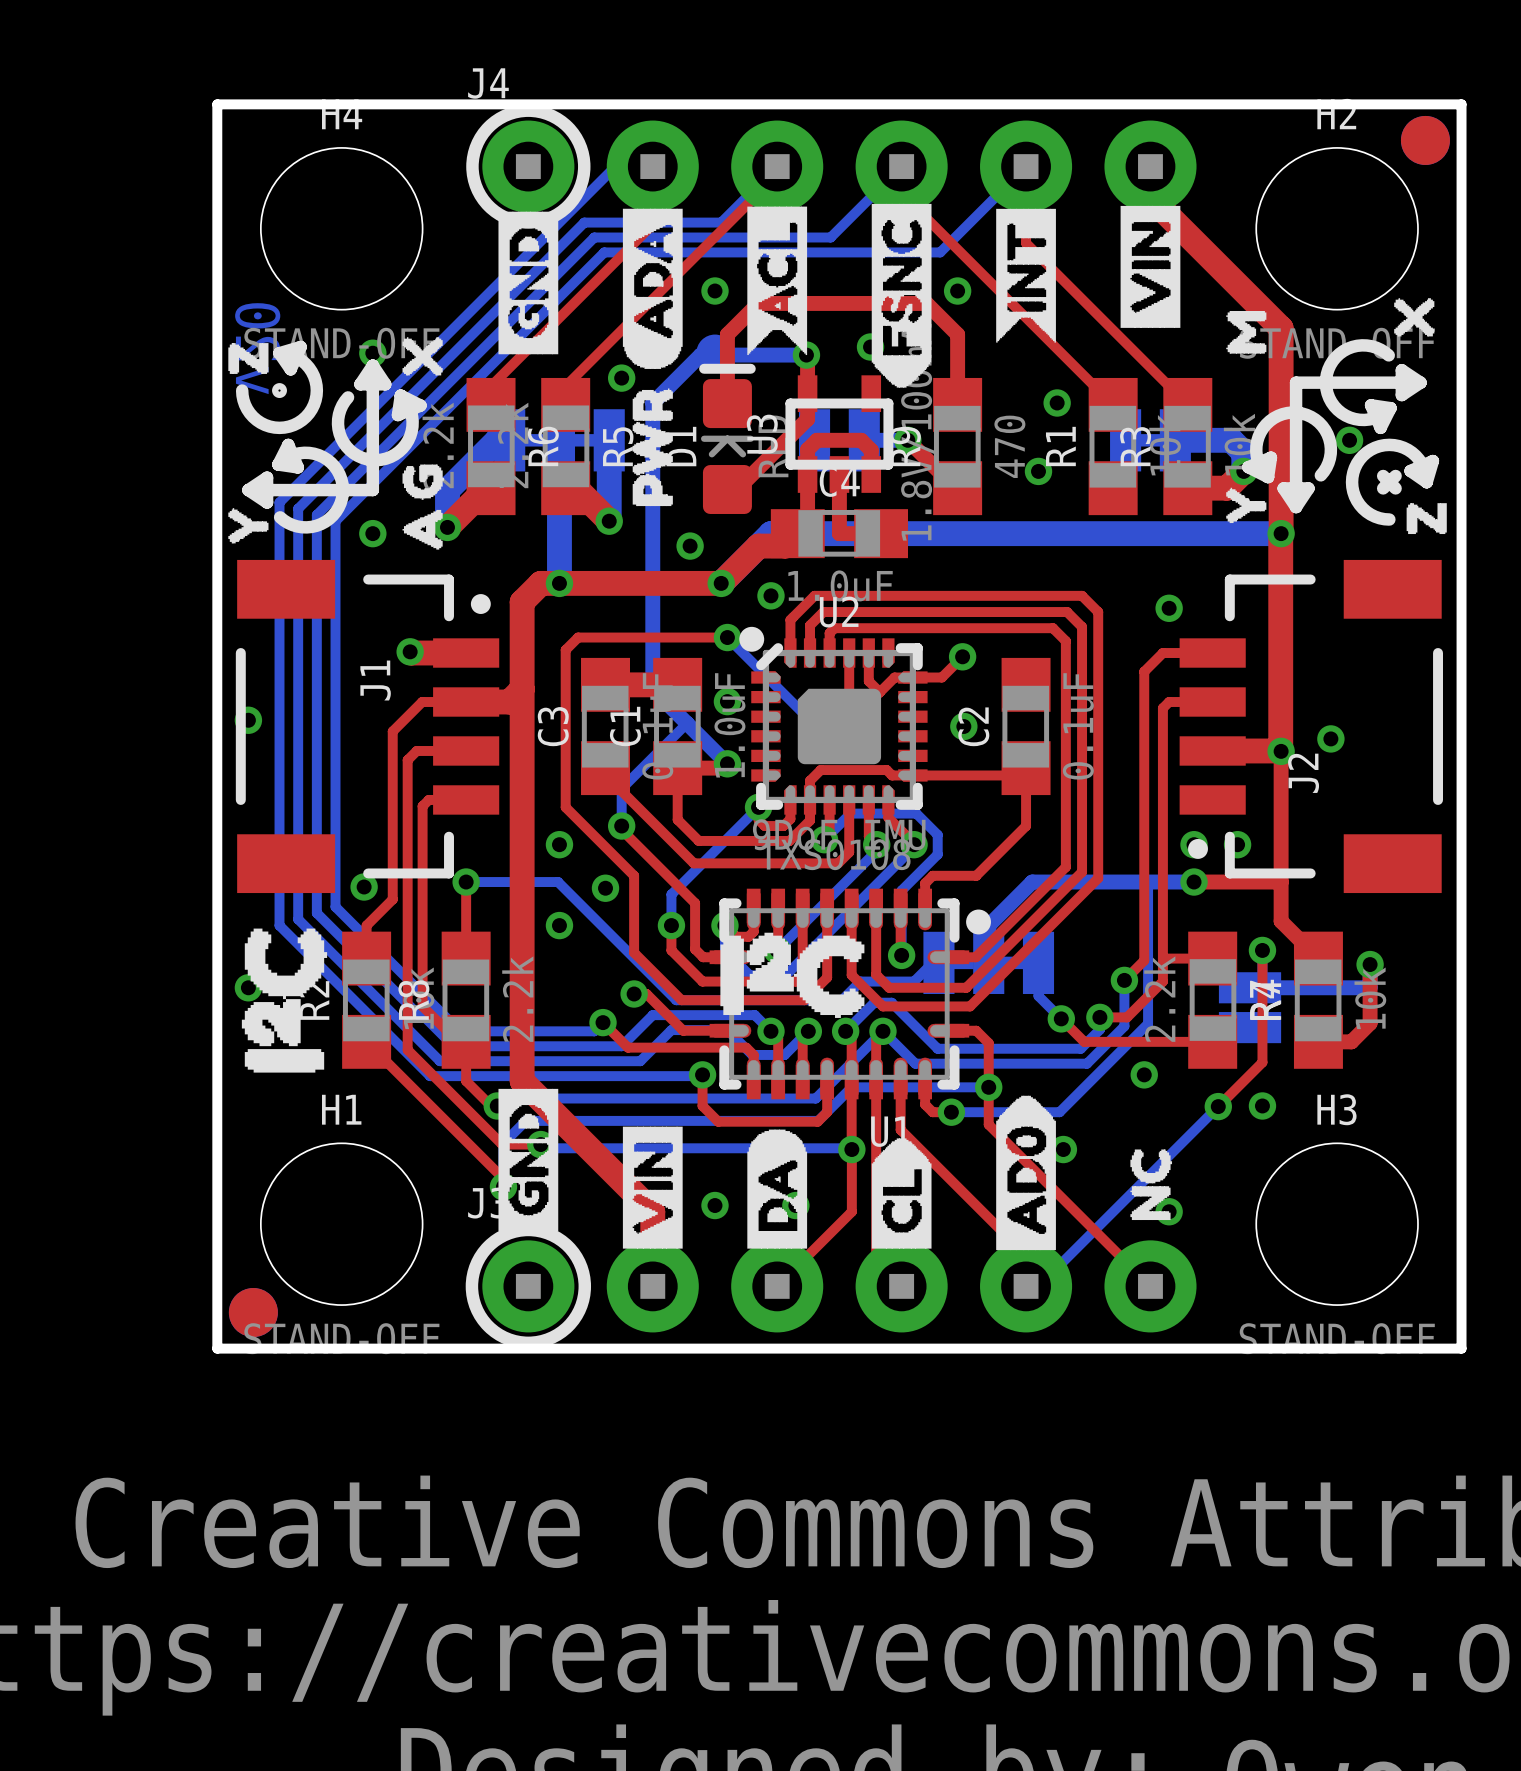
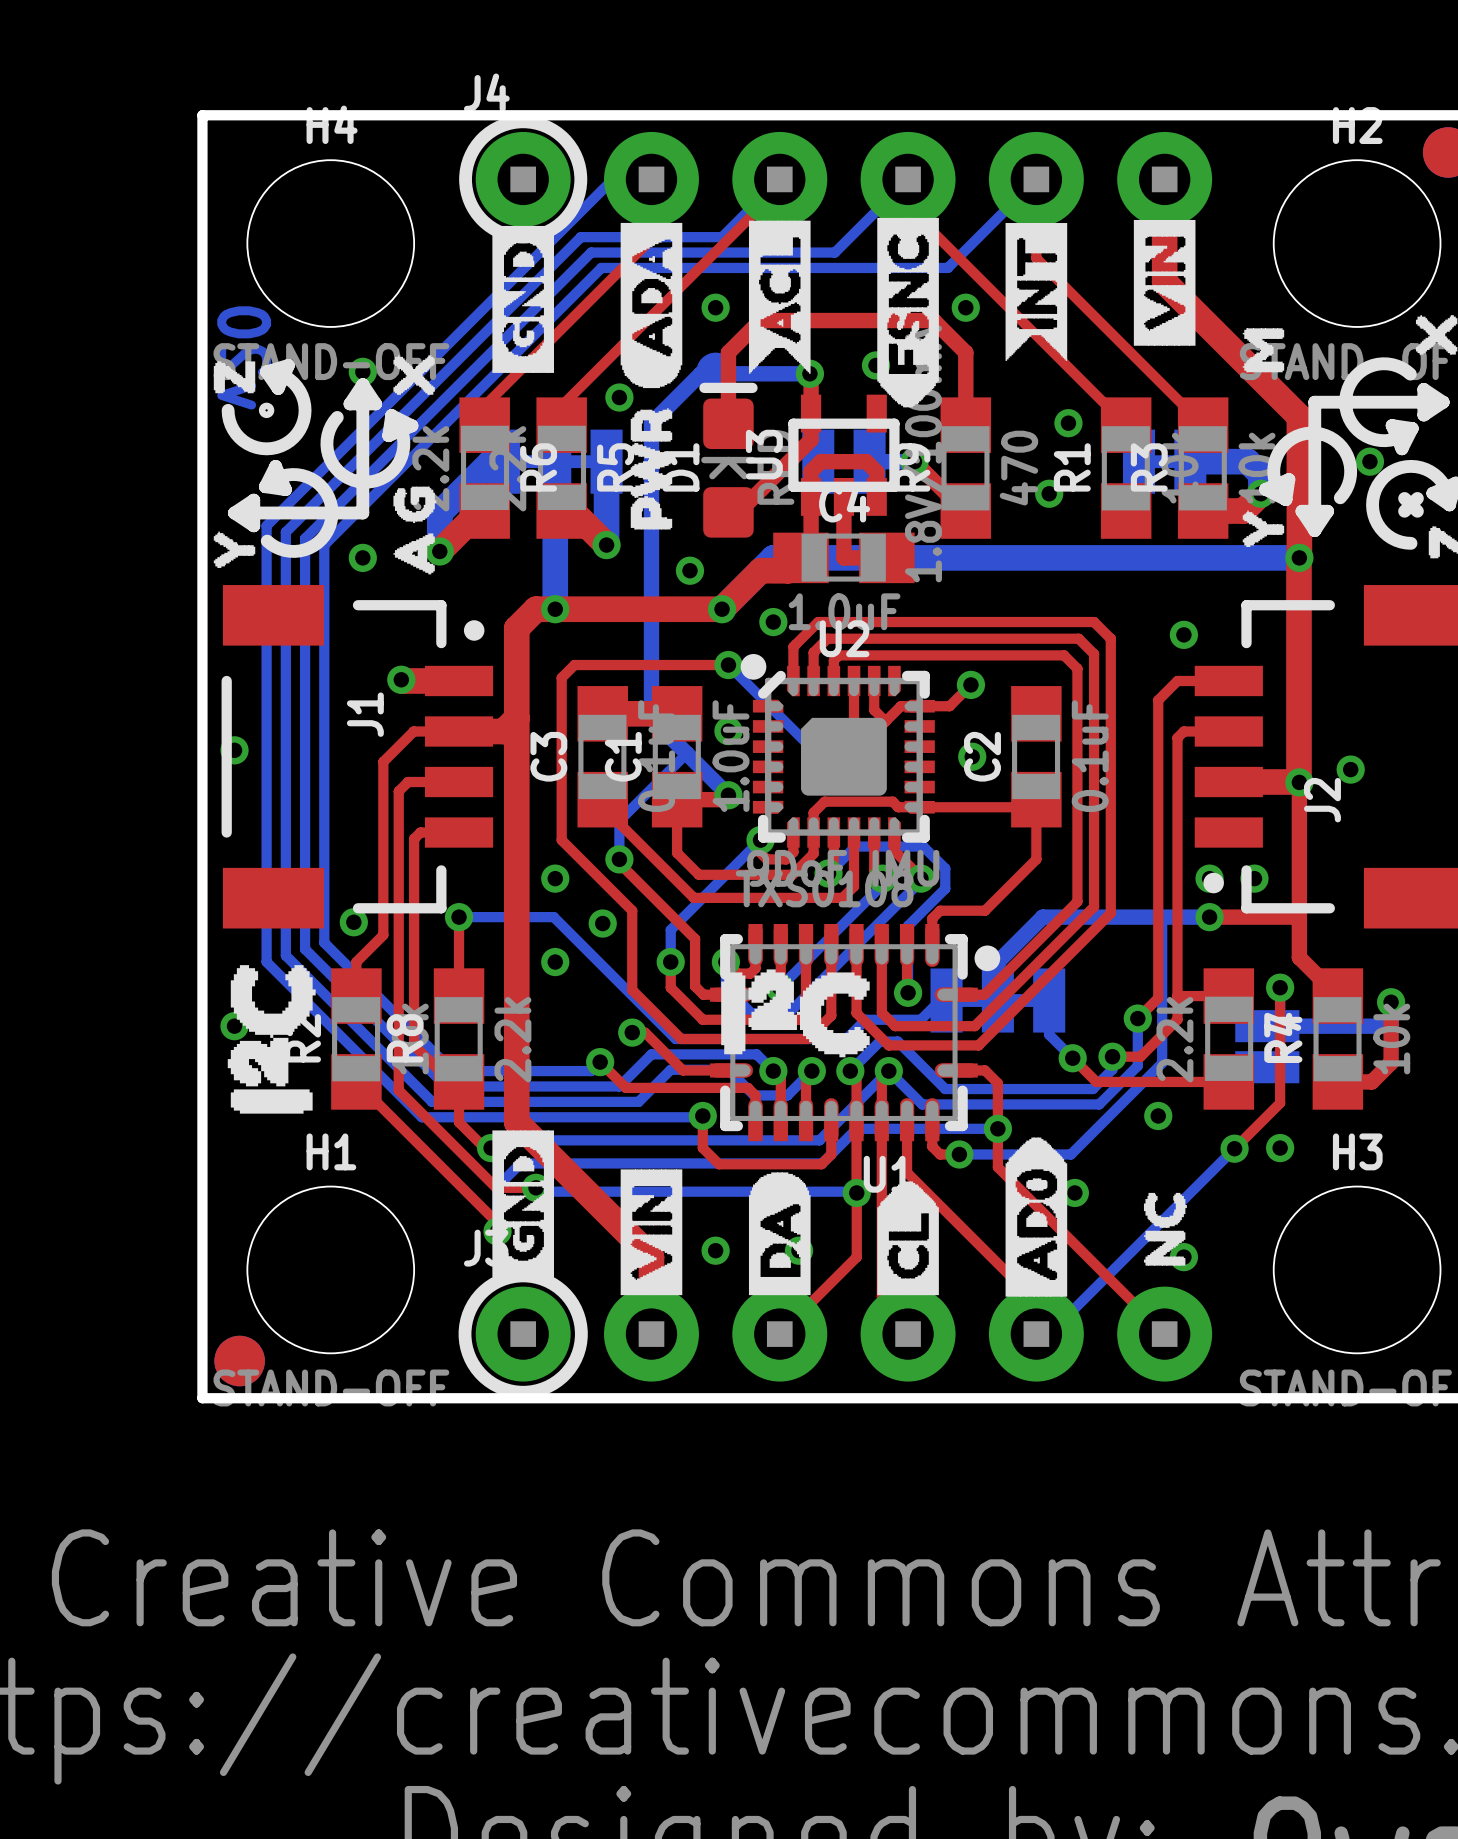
top track: (1150, 197) (1281, 328) (1281, 396) -> (1164, 211) (1164, 282) (1299, 416)

